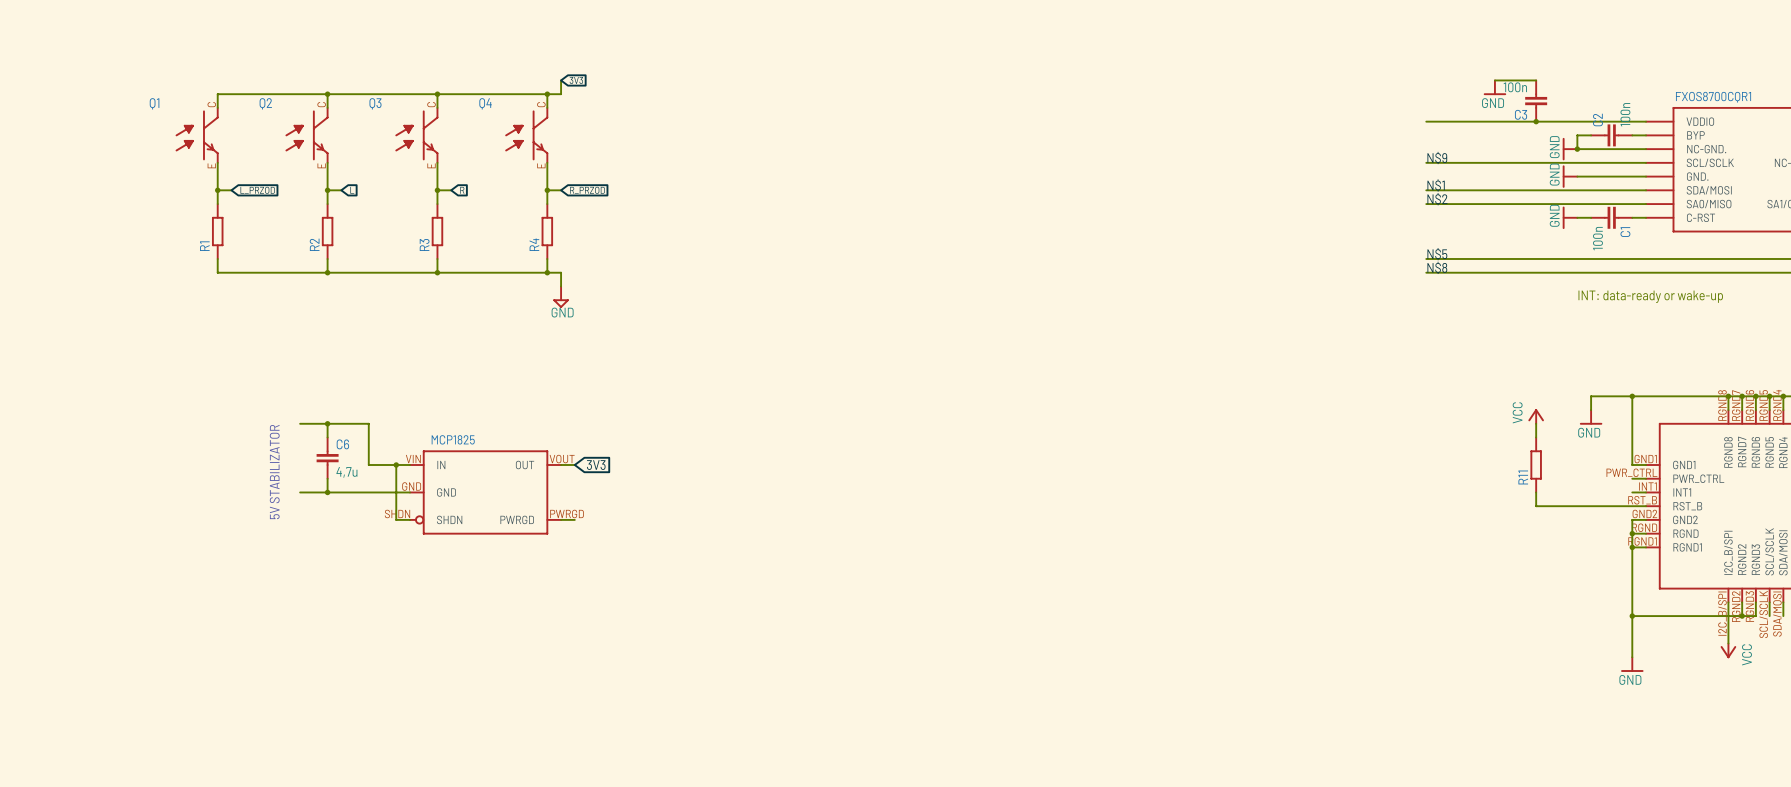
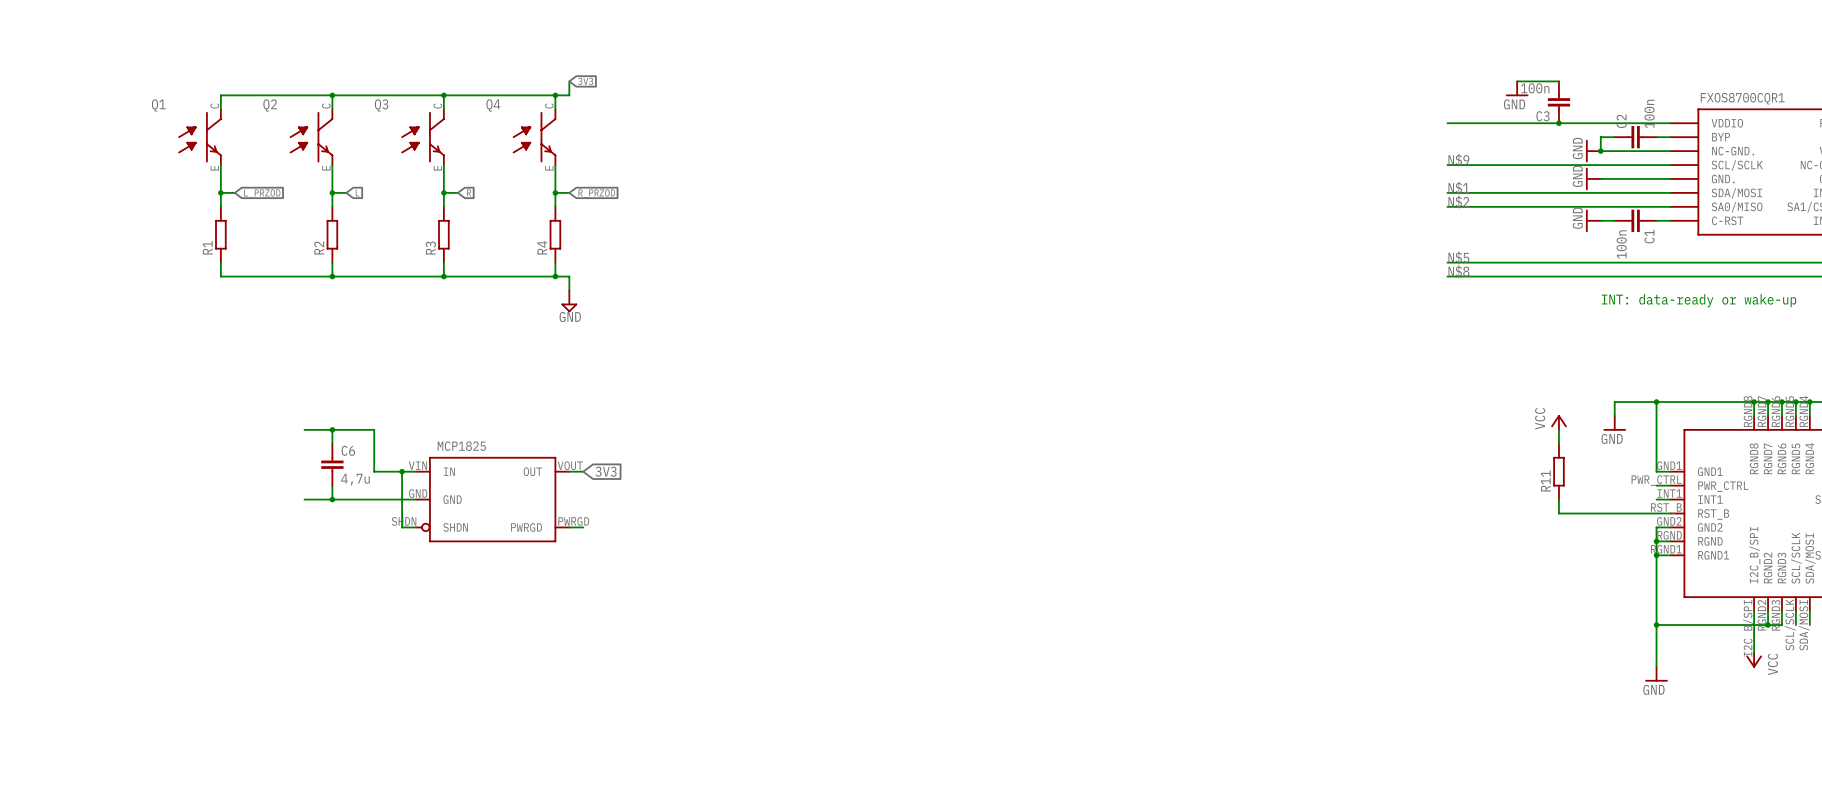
text: 5V STABILIZATOR (274, 472) -> none

